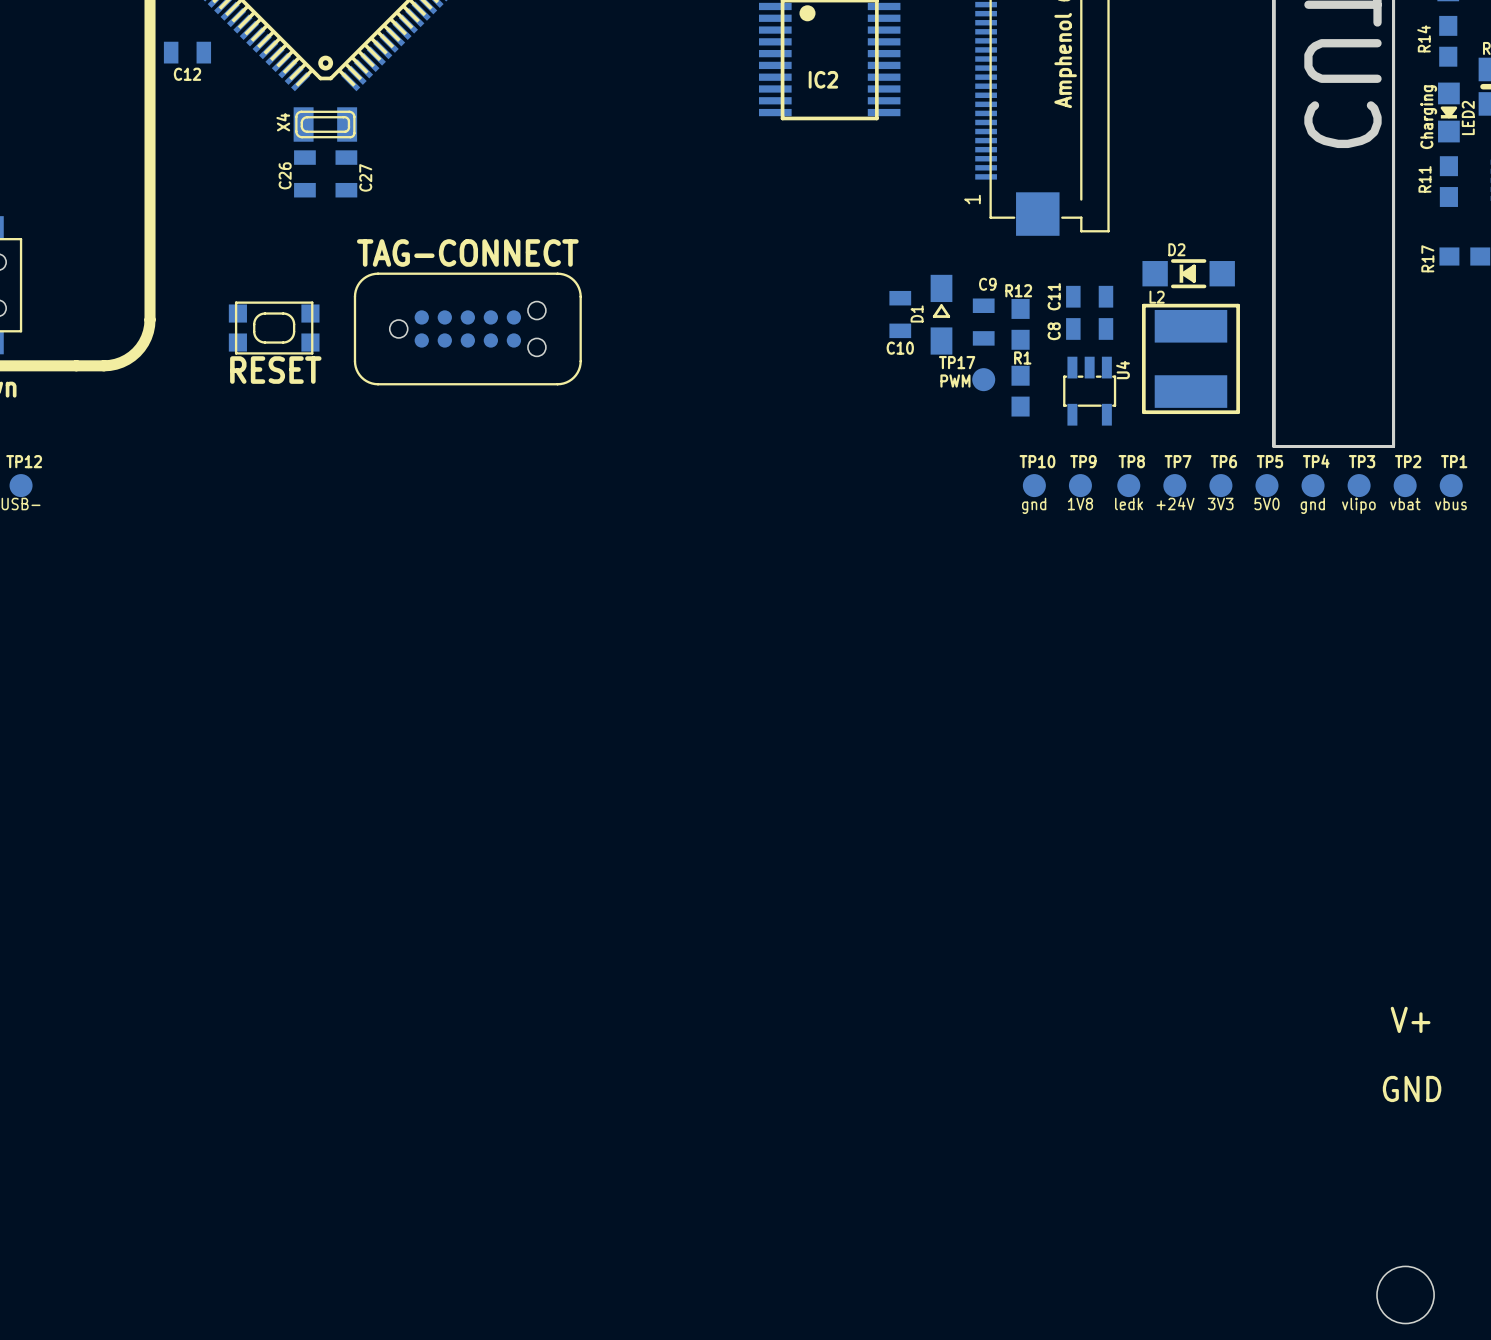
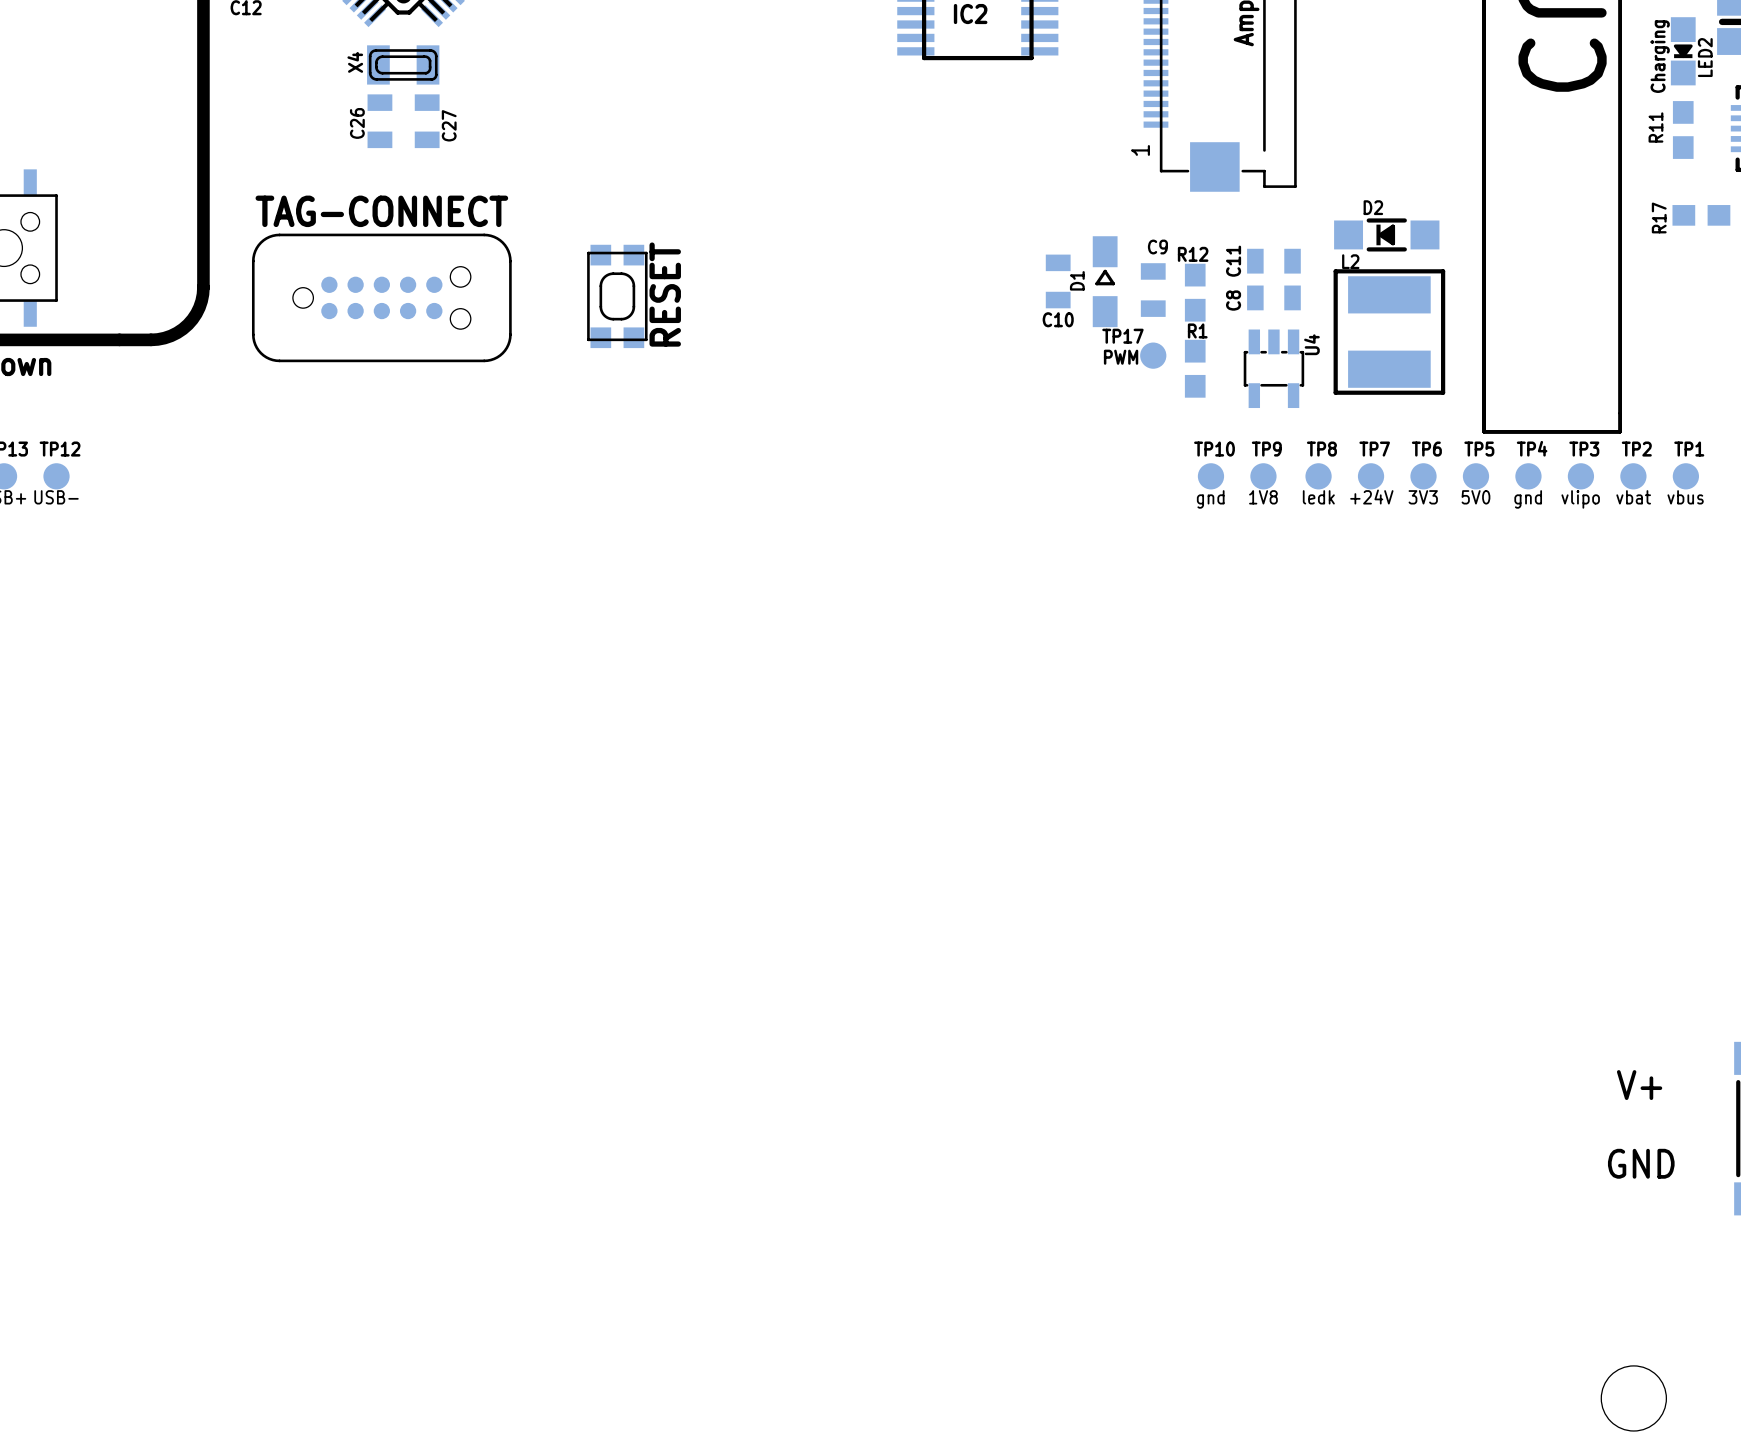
part rotation: 0° (274, 328) -> 90° clockwise (617, 296)
part position: (274, 328) -> (617, 296)
TAG-CONNECT position: (467, 328) -> (381, 297)
text rotation: 0° (275, 370) -> 90° counterclockwise (665, 294)
text position: RESET (275, 370) -> RESET (665, 294)

